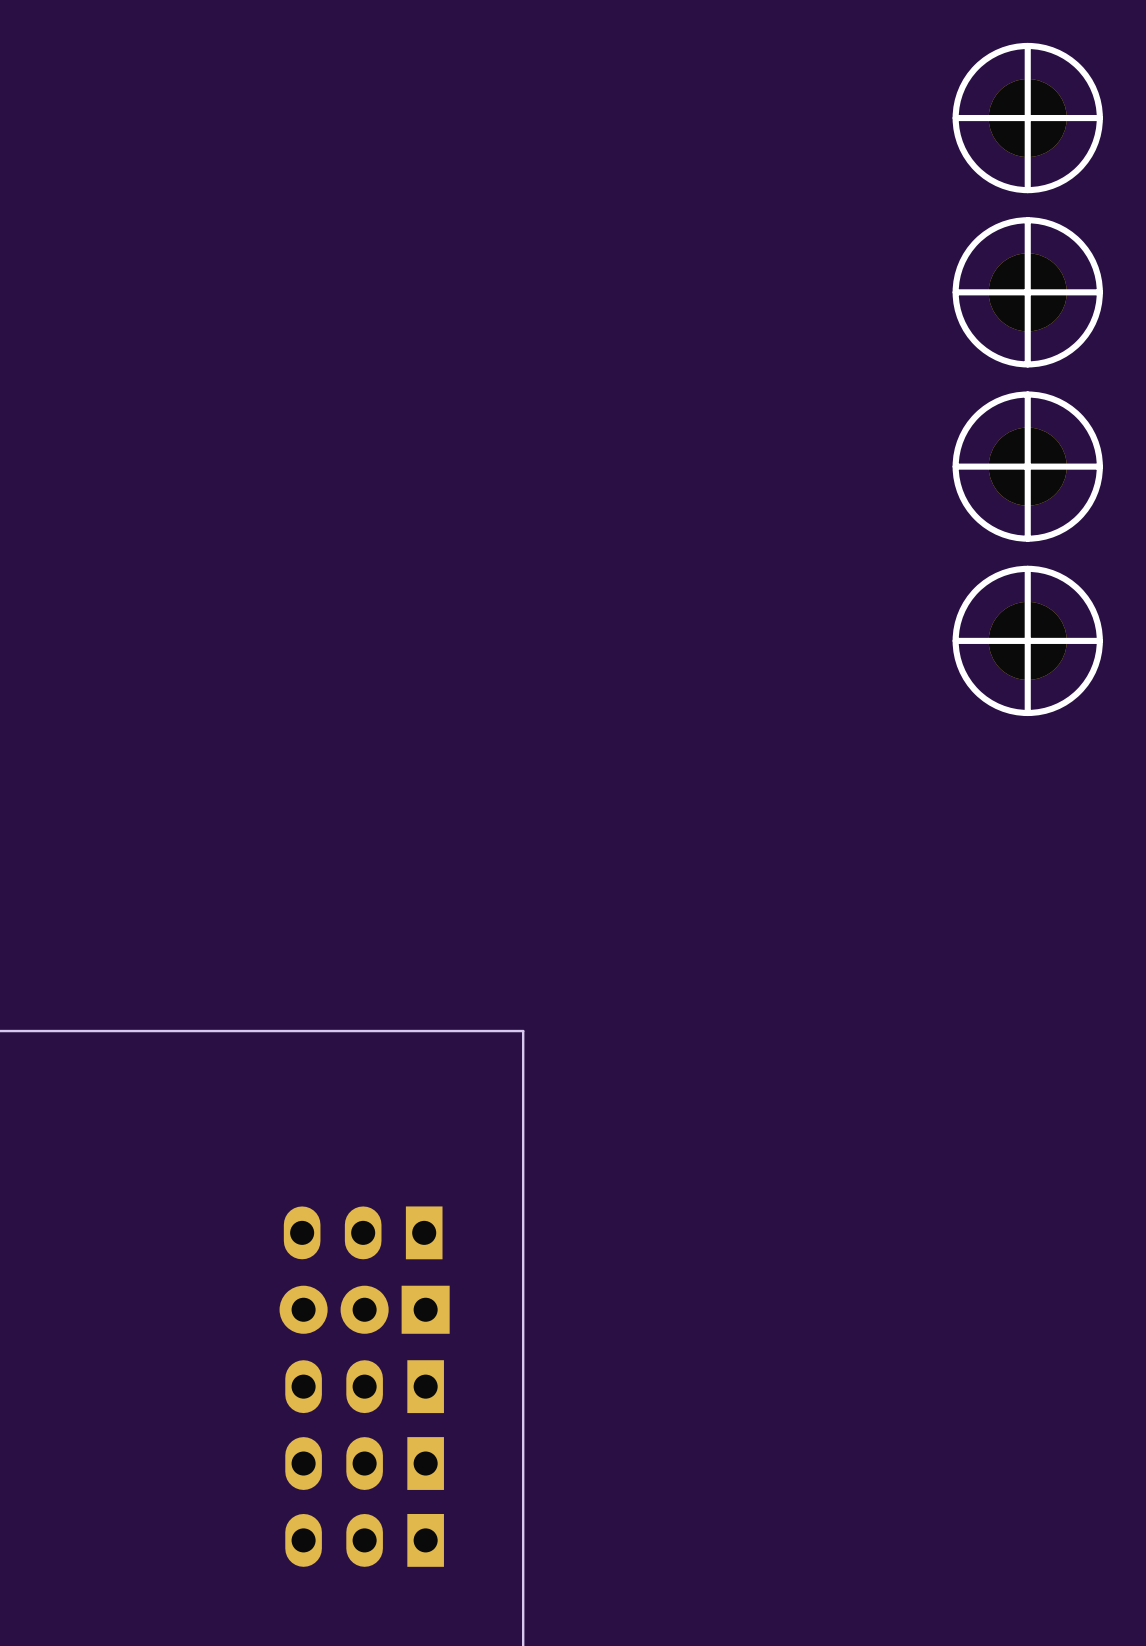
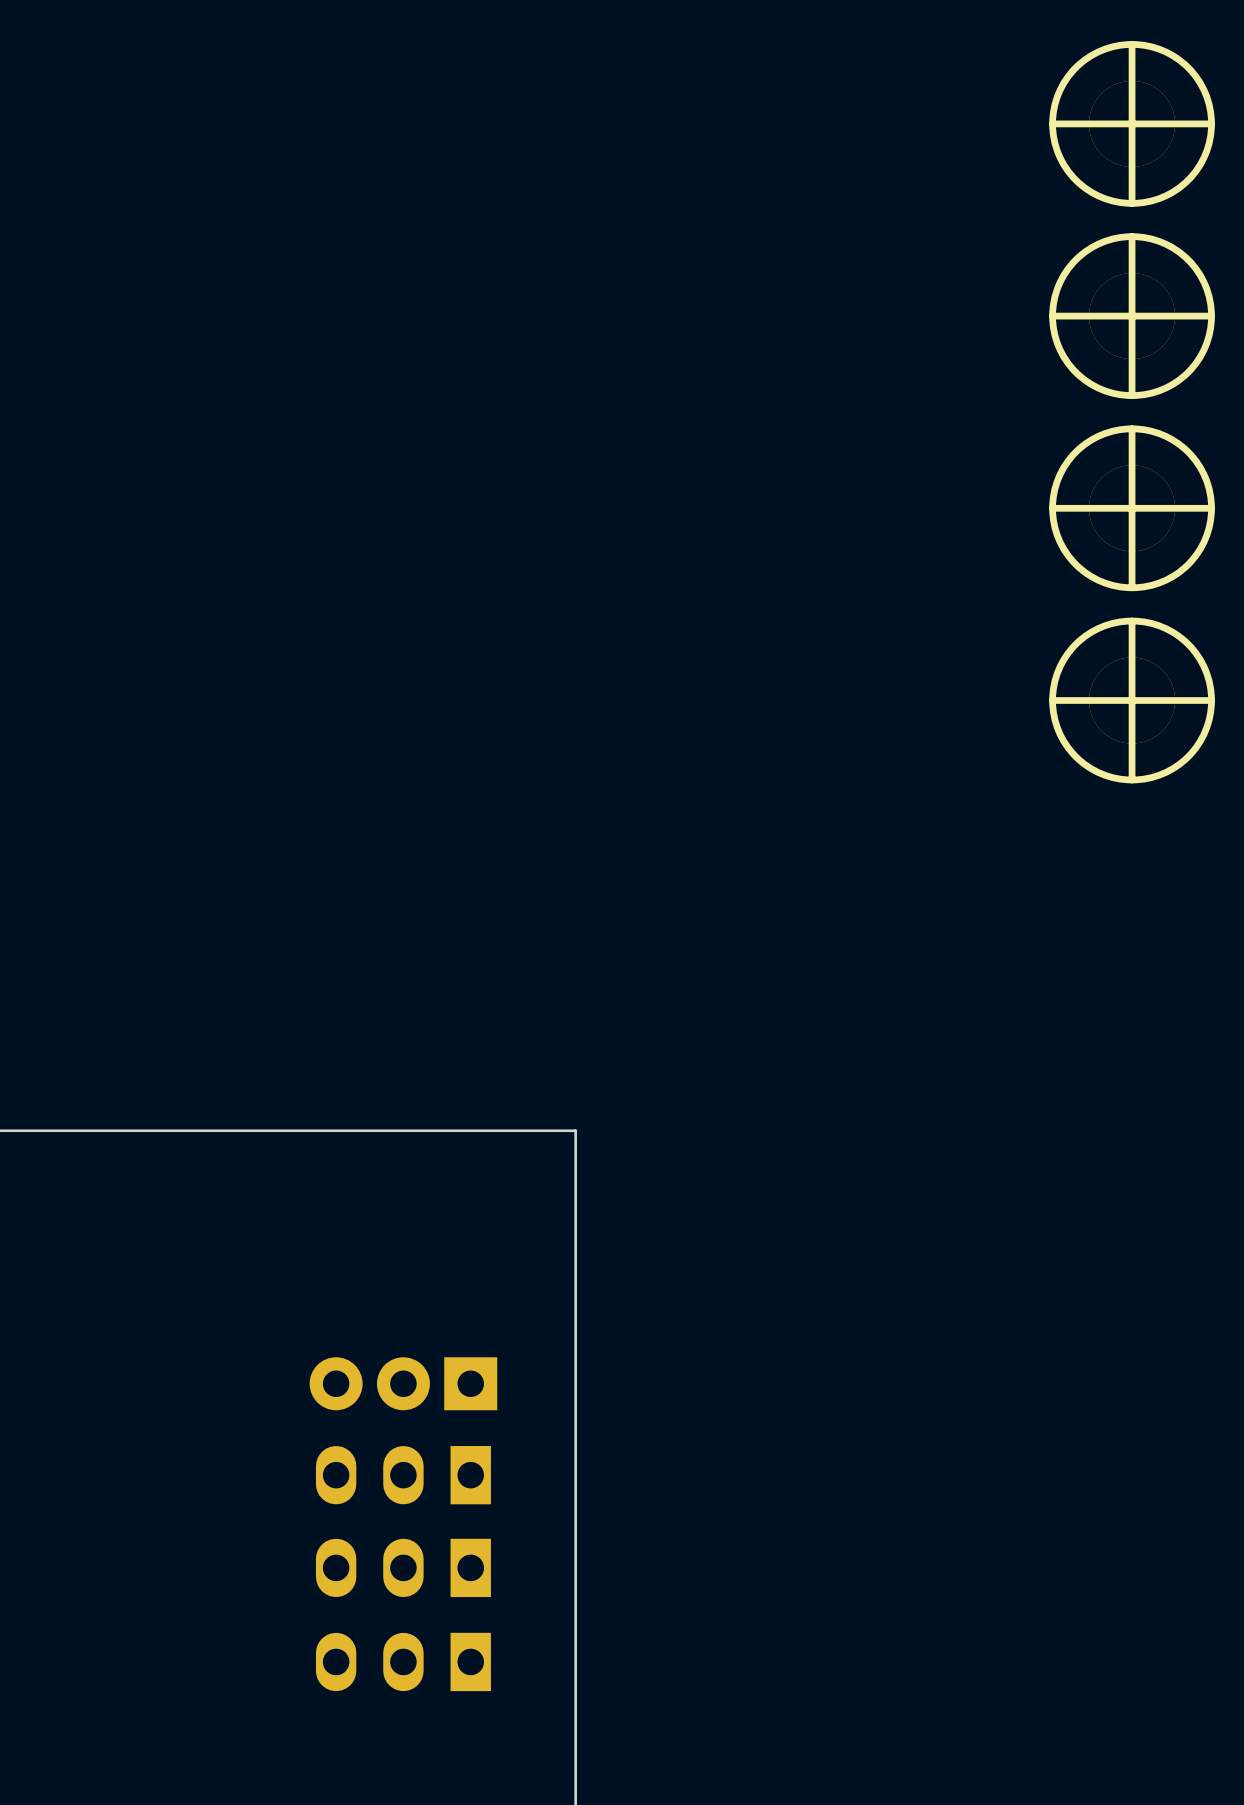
part: (363, 1232) -> none
part position: (364, 1309) -> (403, 1383)
part: none -> (403, 1475)
part: (364, 1386) -> none
part: none -> (403, 1567)
part: (364, 1463) -> none
part: none -> (403, 1661)
part: (364, 1540) -> none

